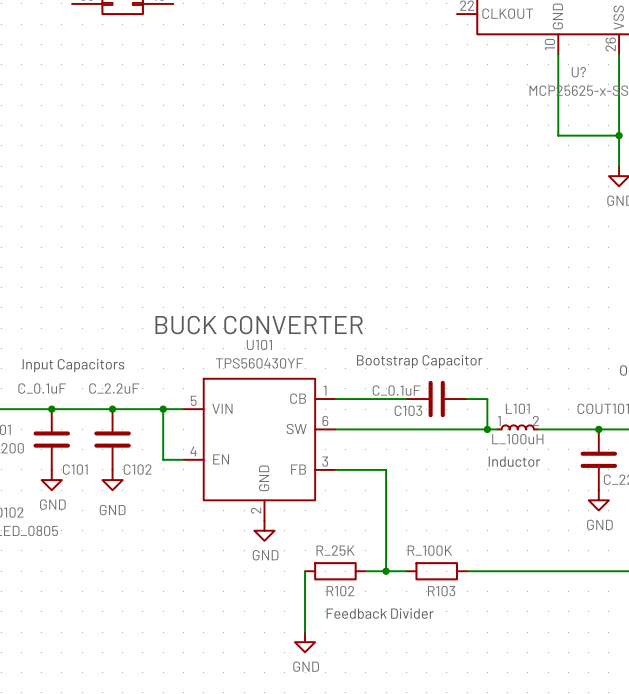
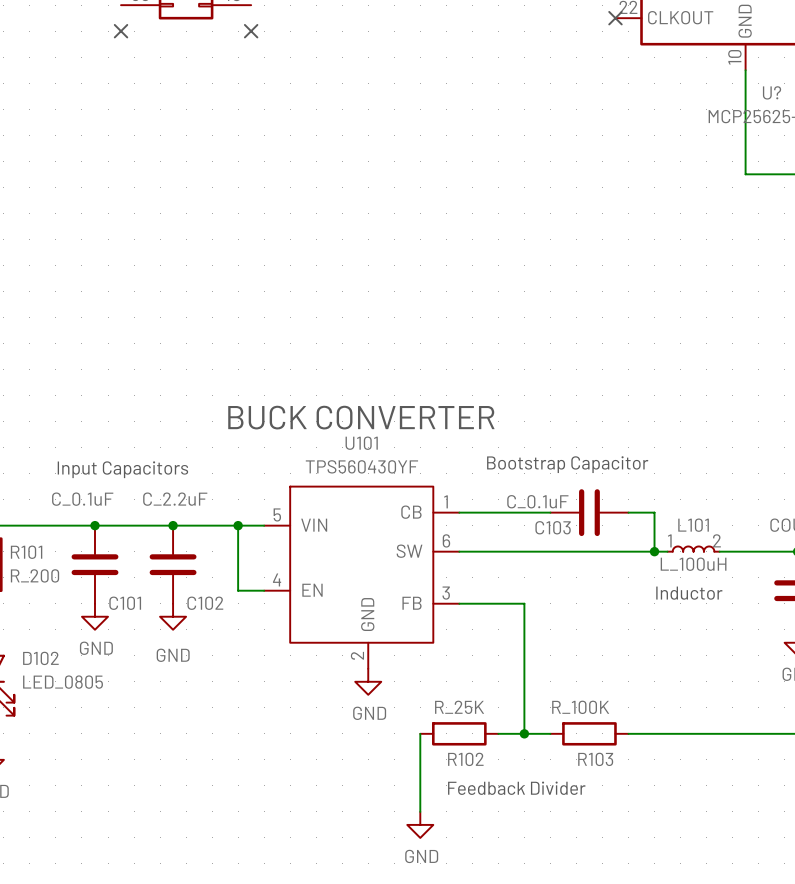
no-connect mark: none -> (615, 18)
no-connect mark: none -> (121, 31)
no-connect mark: none -> (251, 31)

